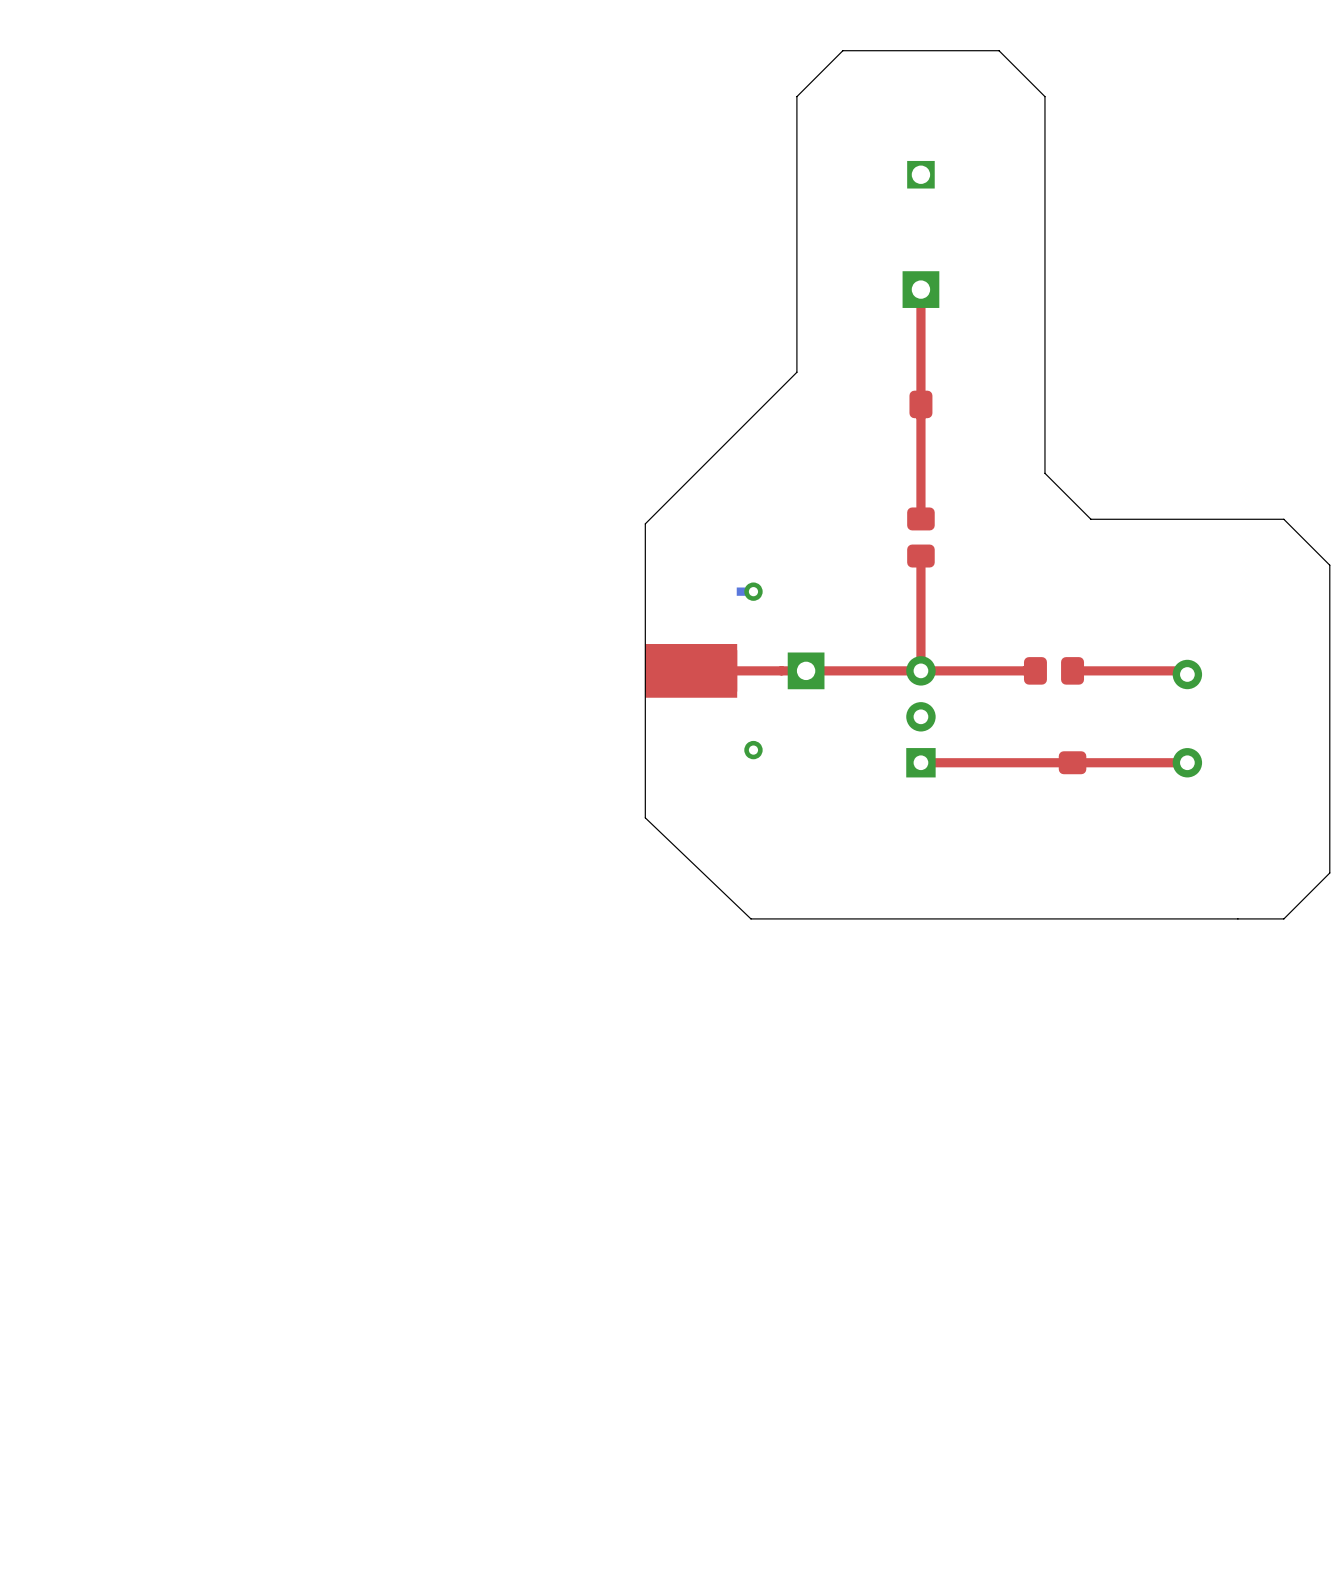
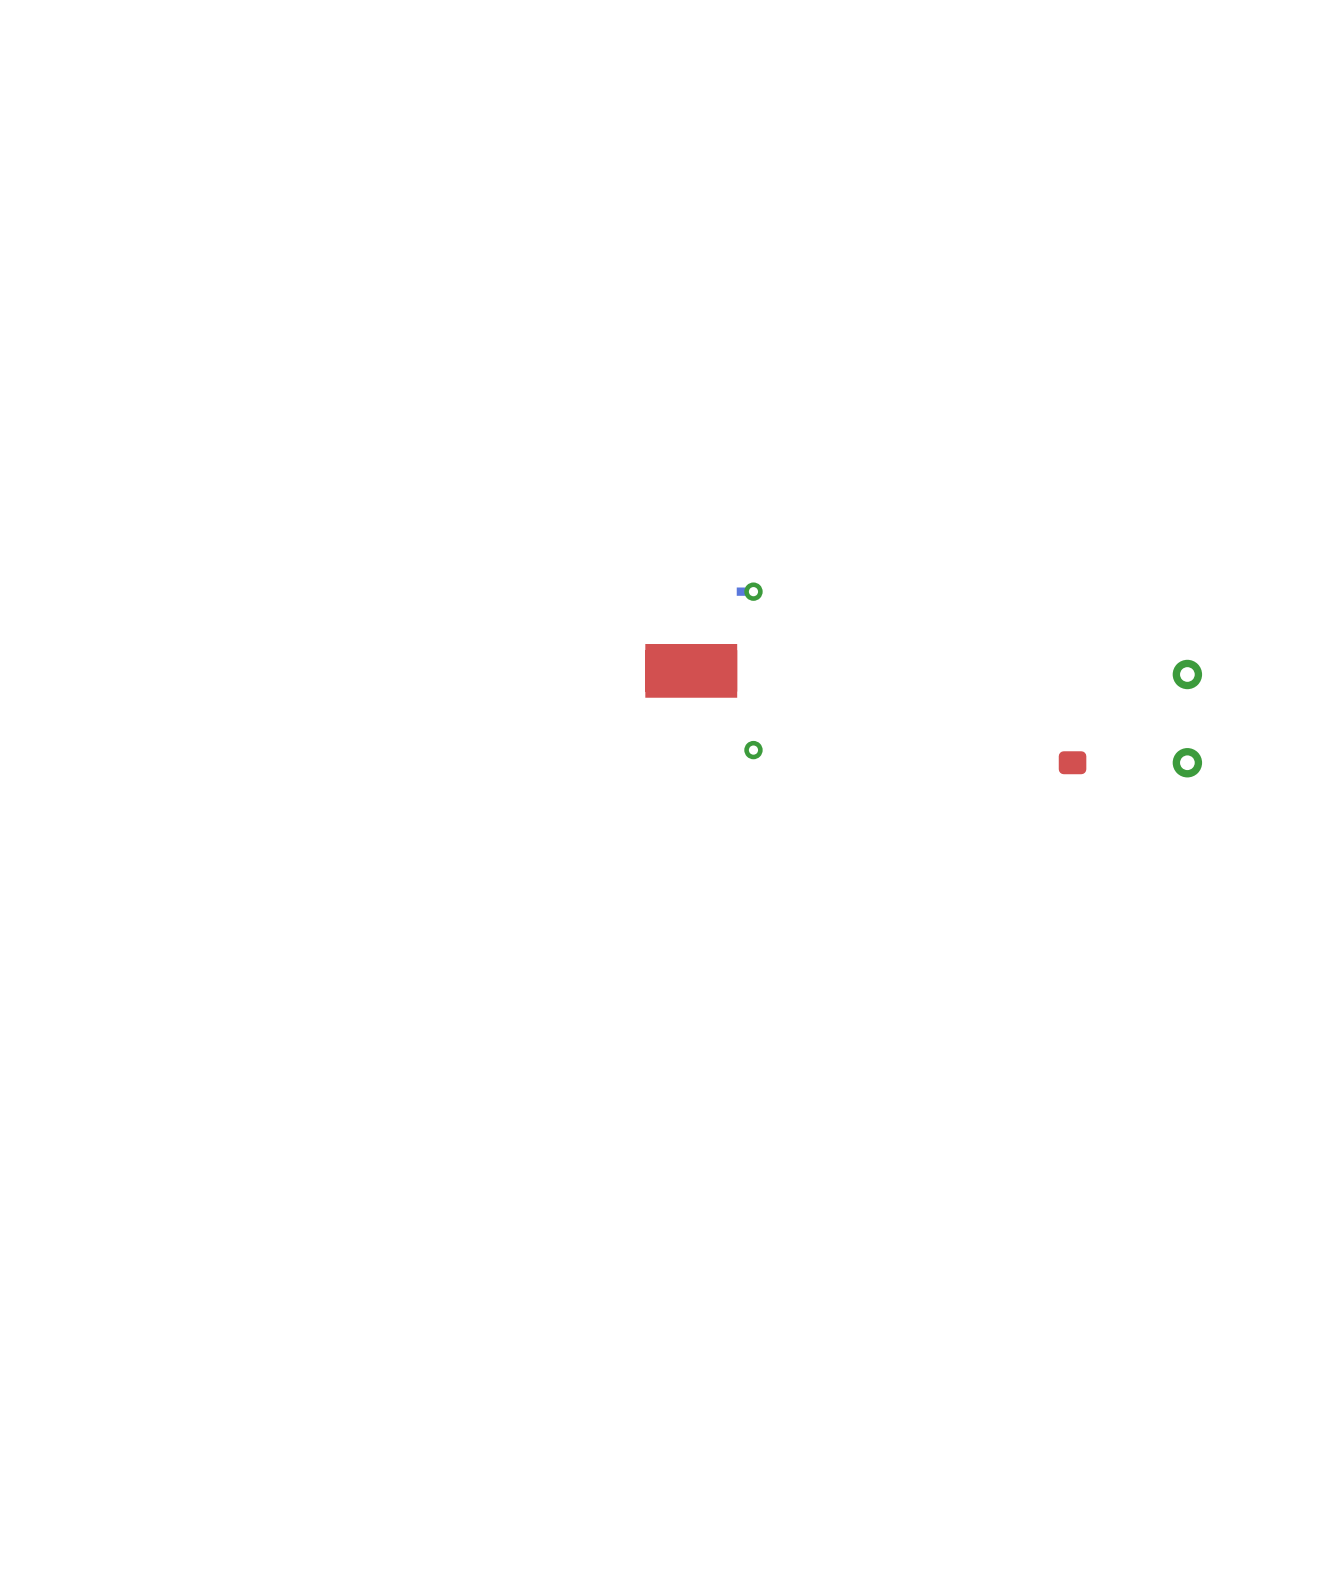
board edge: (999, 50) (1044, 96) (1044, 473) (1090, 519) (1283, 519) (1329, 565) (1329, 872) (1283, 918) (750, 918) (645, 817) (645, 523) (796, 372) (796, 96) (842, 50) (999, 50) -> none
part: (920, 174) -> none
top track: (920, 289) (920, 518) -> none
part: (920, 289) -> none
part: (920, 404) -> none
part: (920, 537) -> none
top track: (920, 556) (920, 670) -> none
part: (806, 670) -> none
top track: (1035, 670) (691, 670) -> none
part: (1054, 670) -> none
top track: (1072, 670) (1183, 670) (1187, 674) -> none
part: (920, 716) -> none
top track: (1187, 762) (920, 762) -> none

